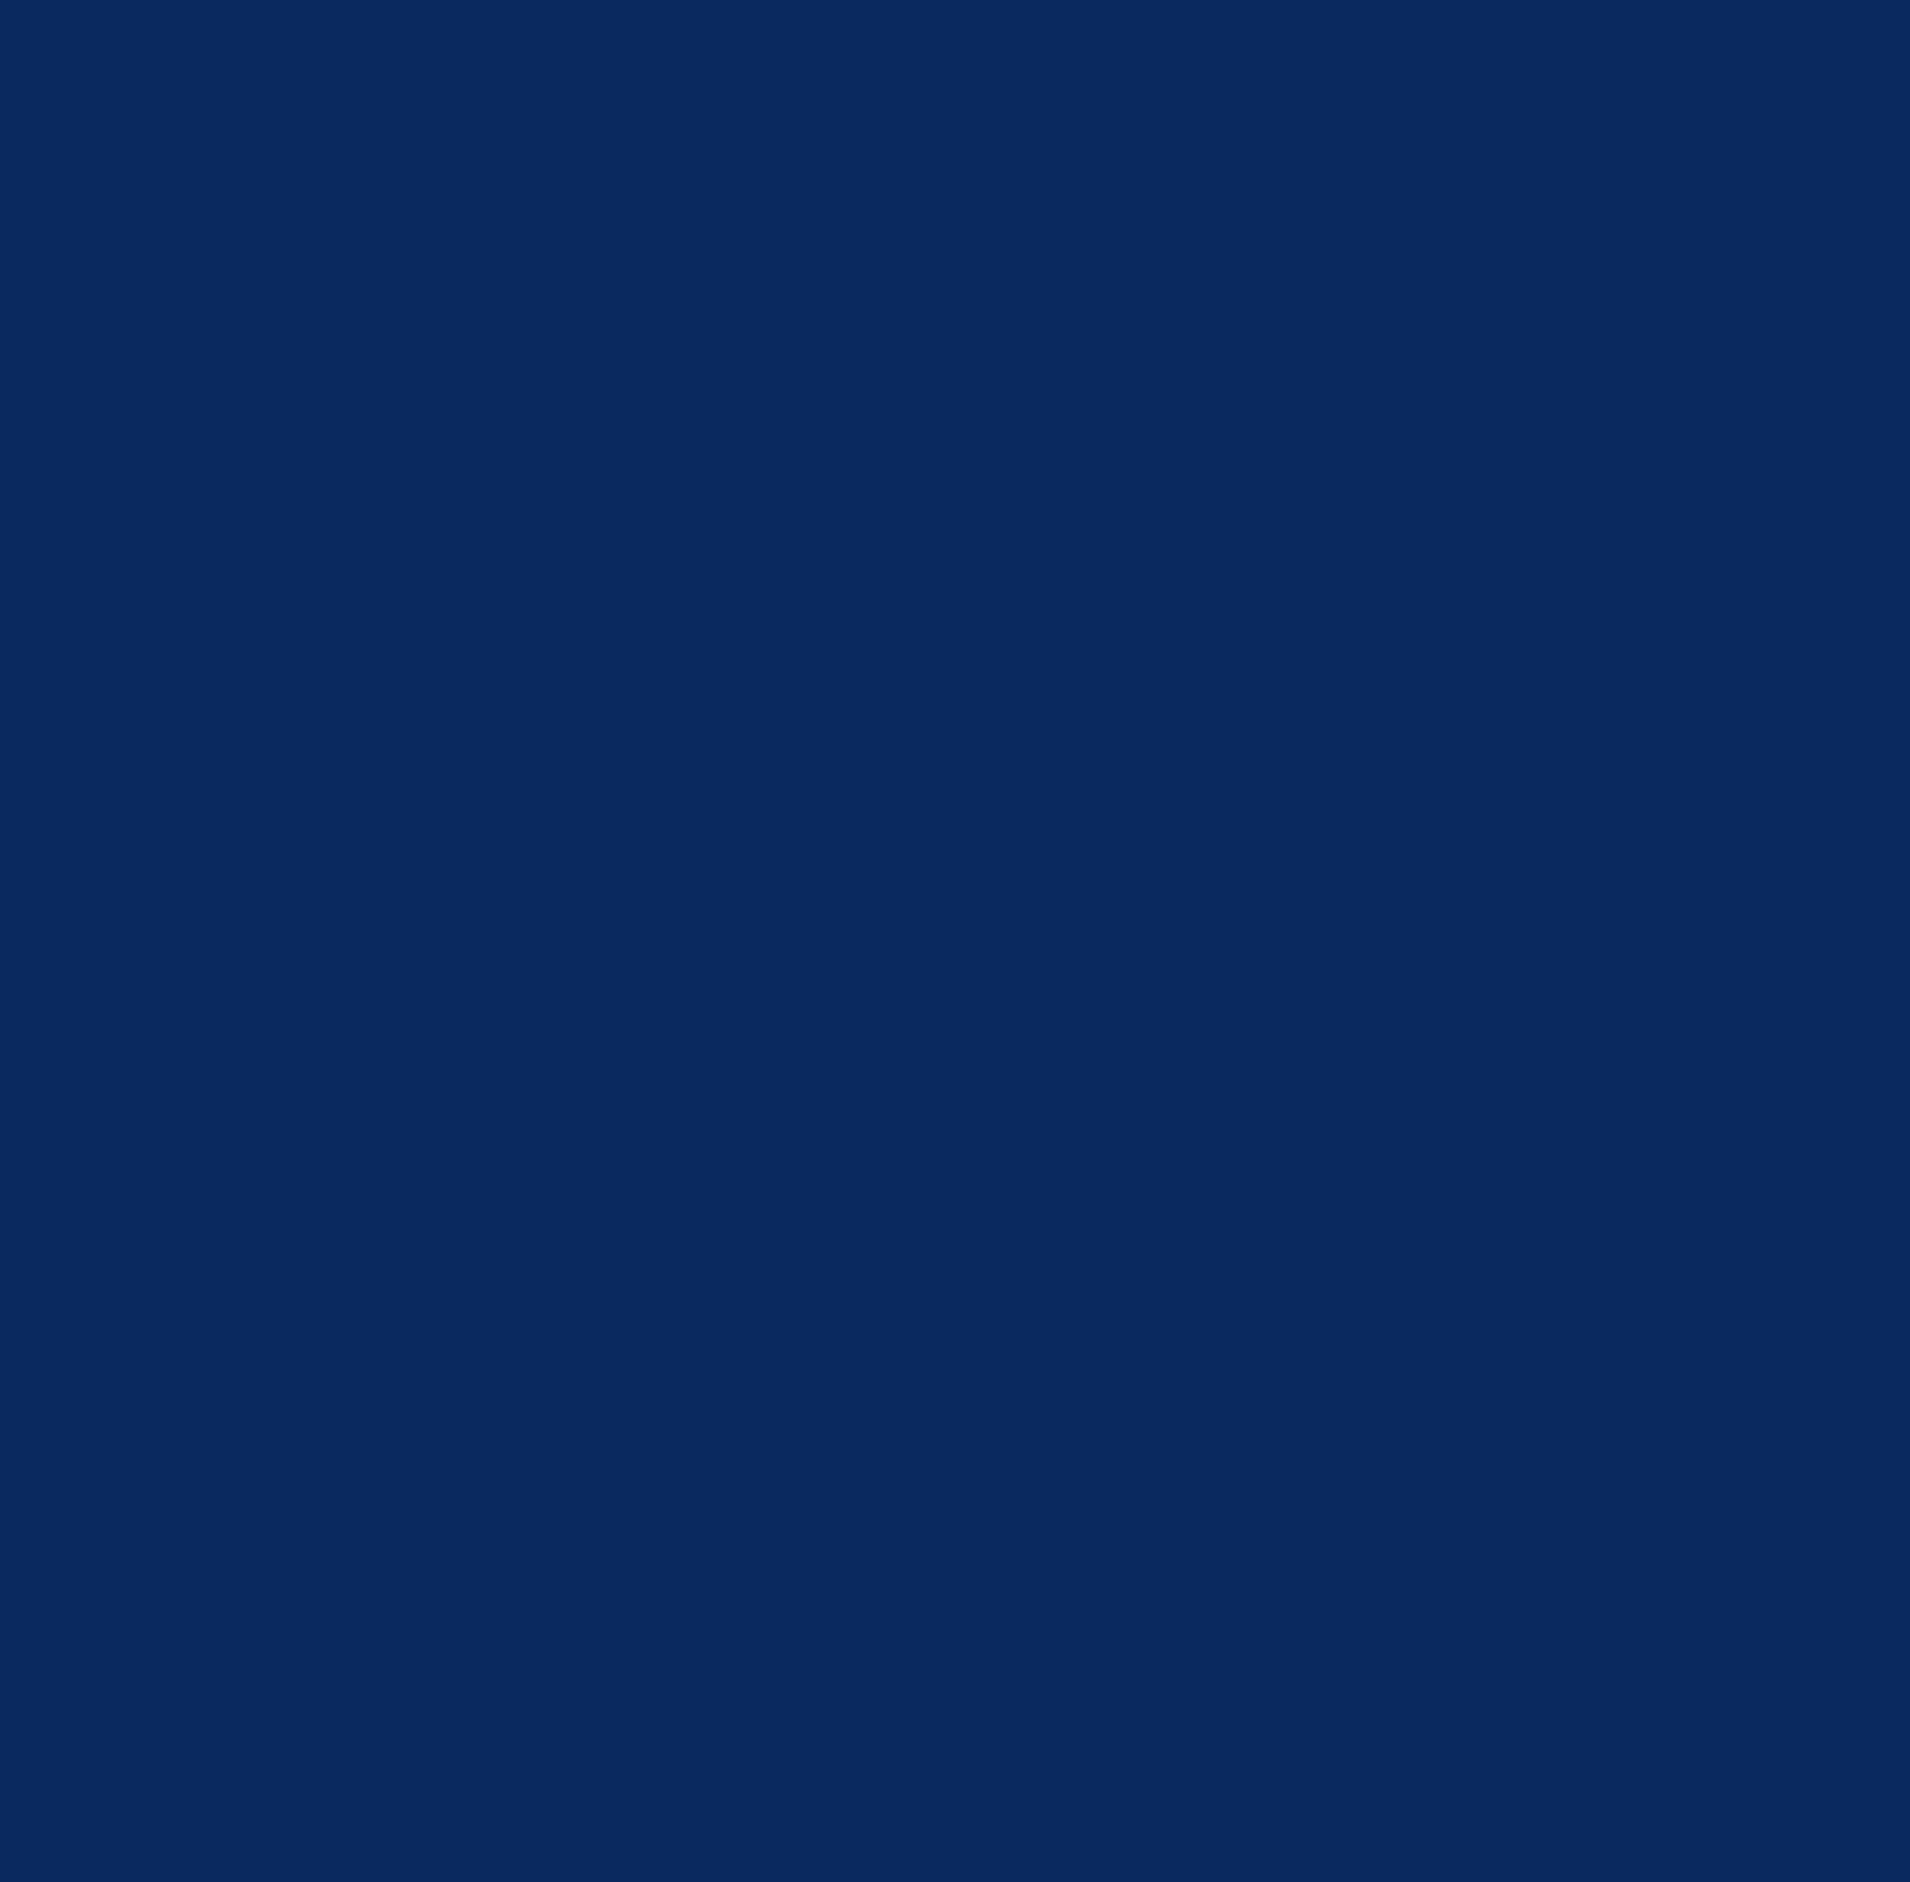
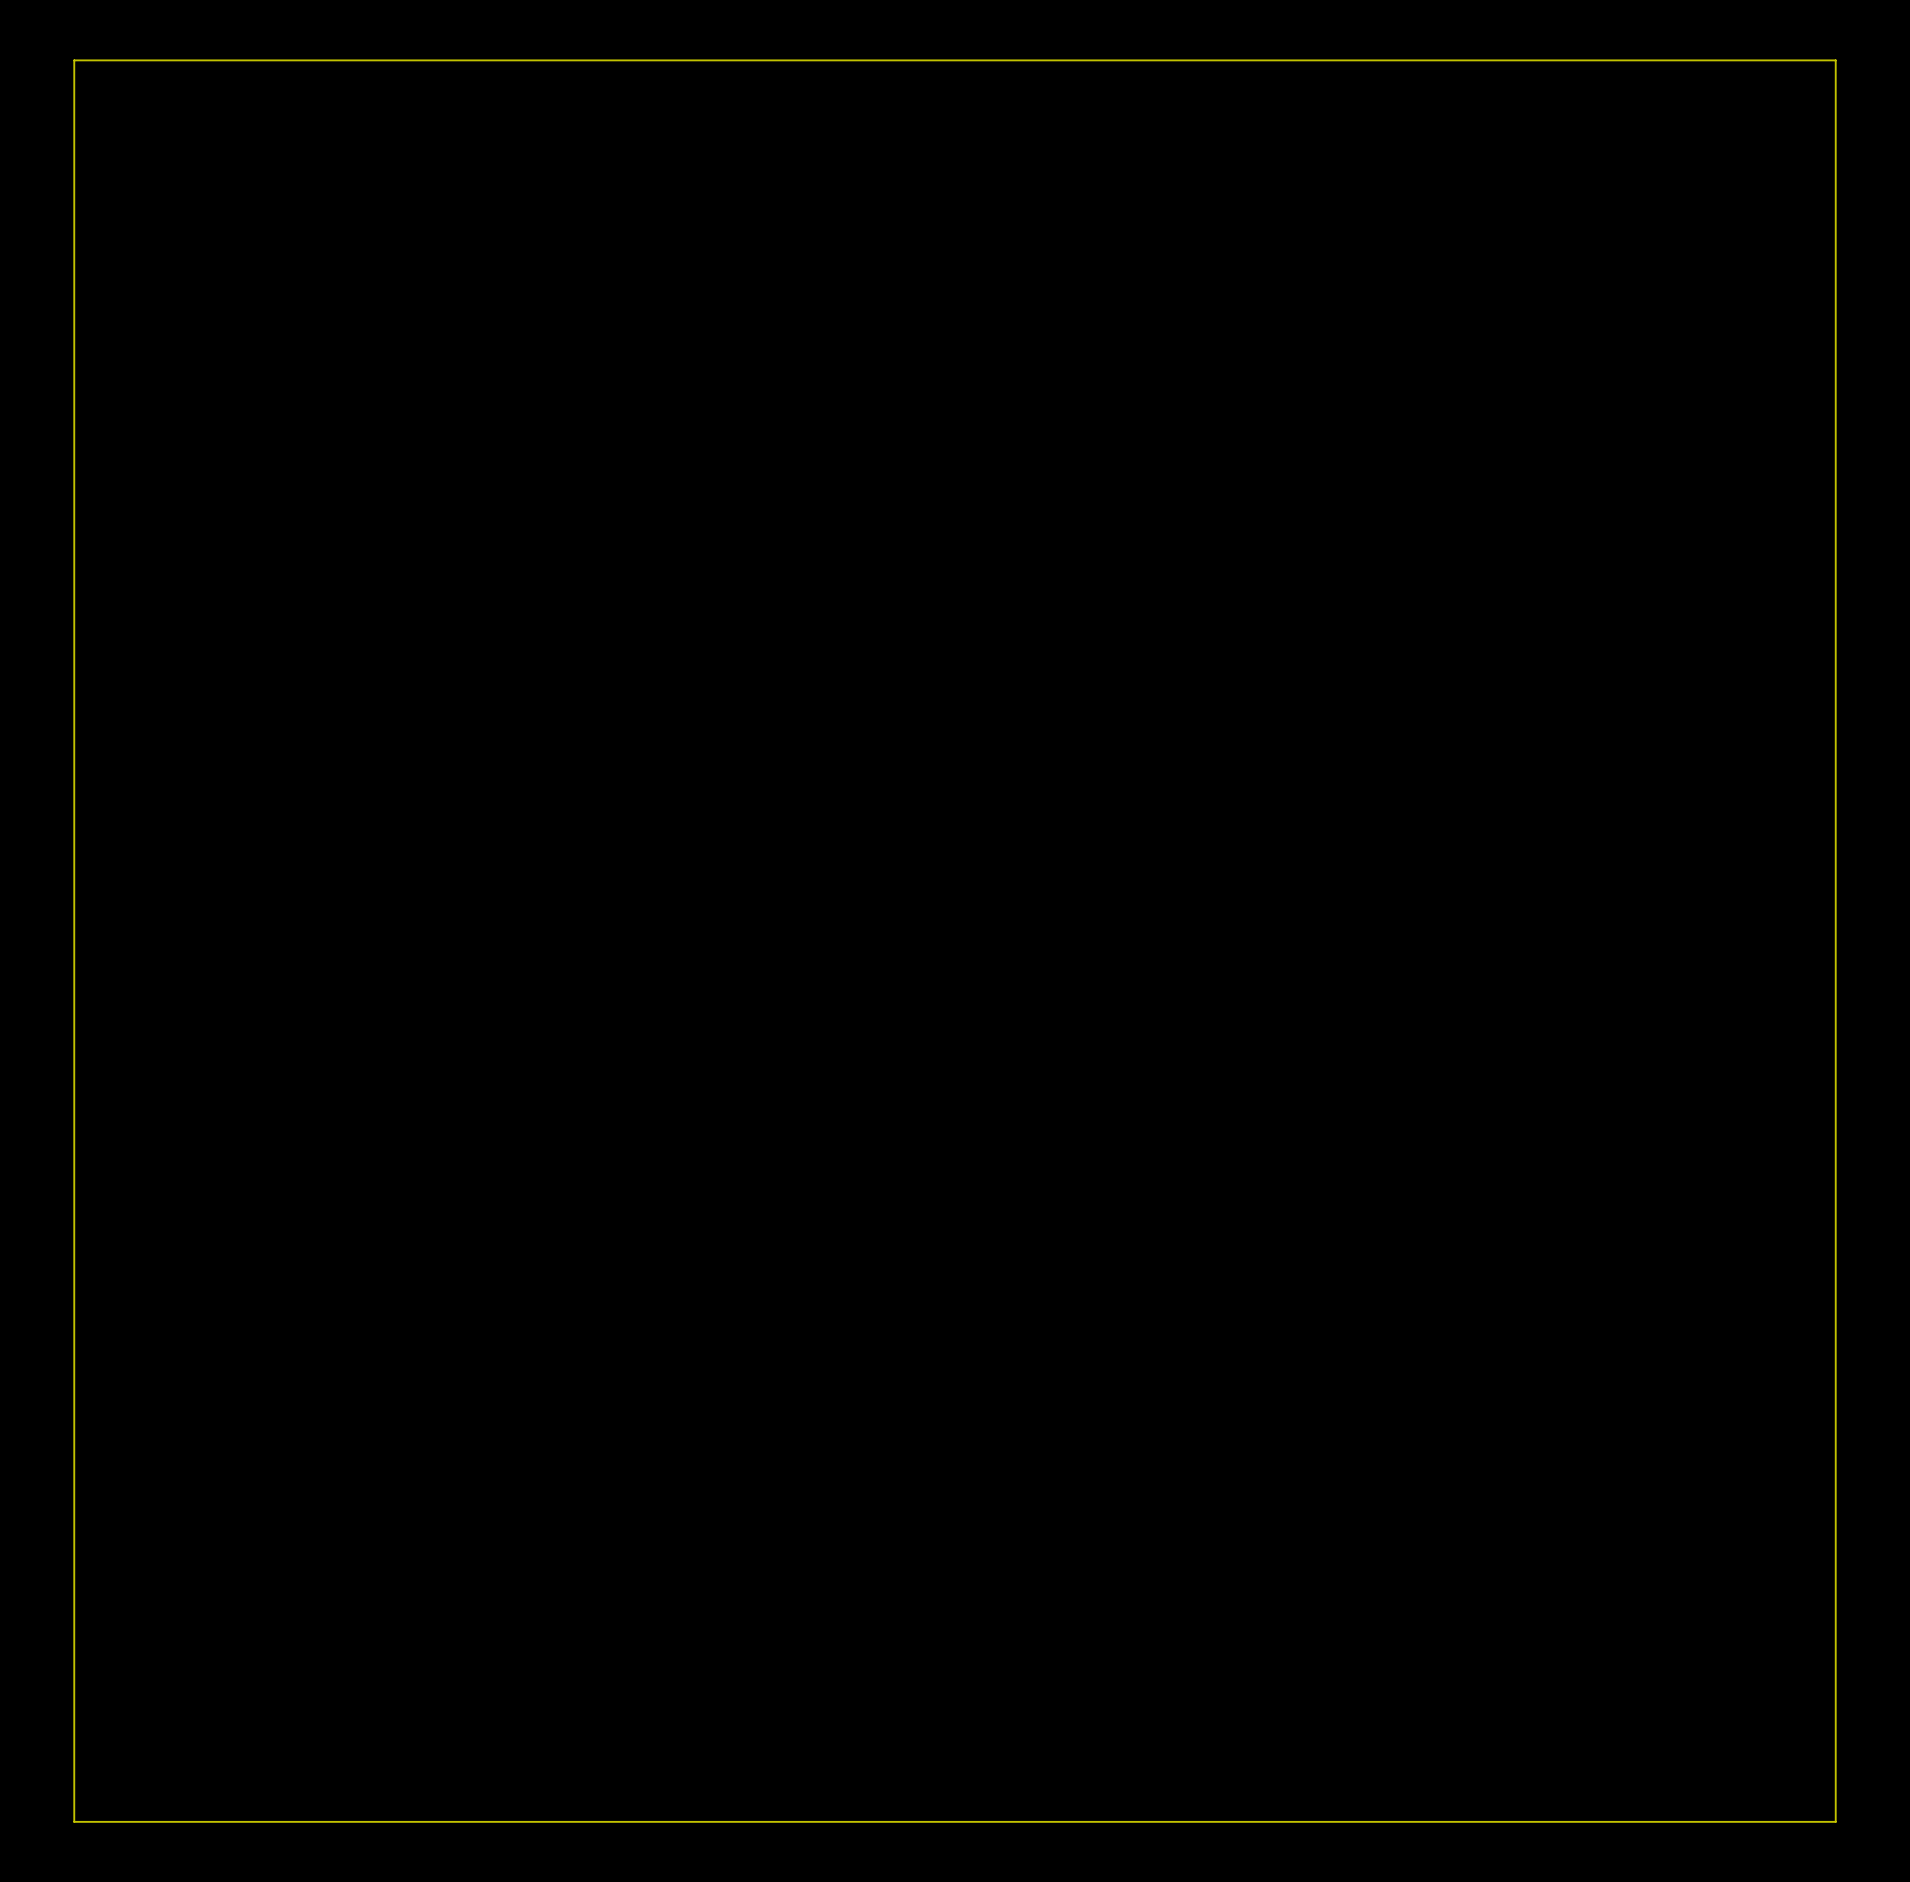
board edge: none -> (74, 60) (1835, 60) (1835, 1821) (74, 1821) (74, 60)

